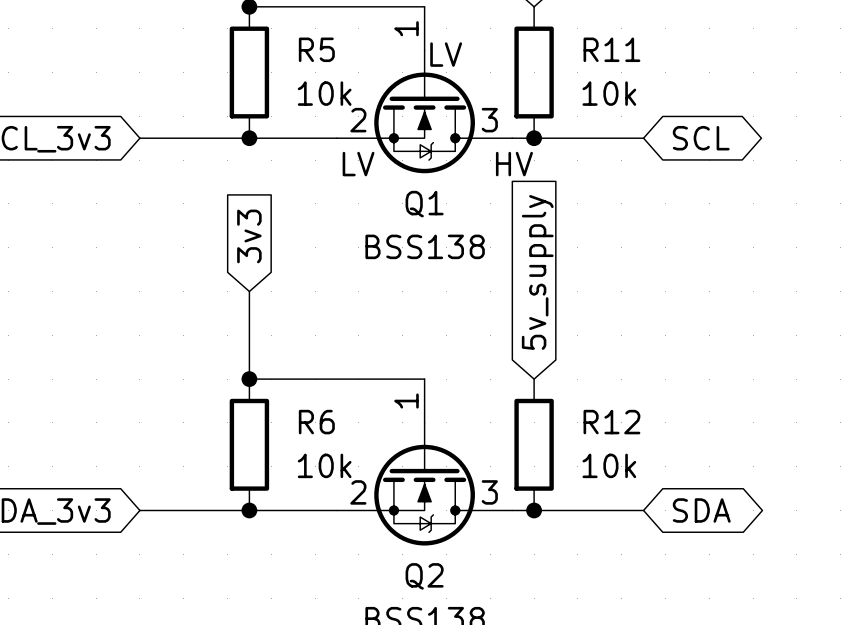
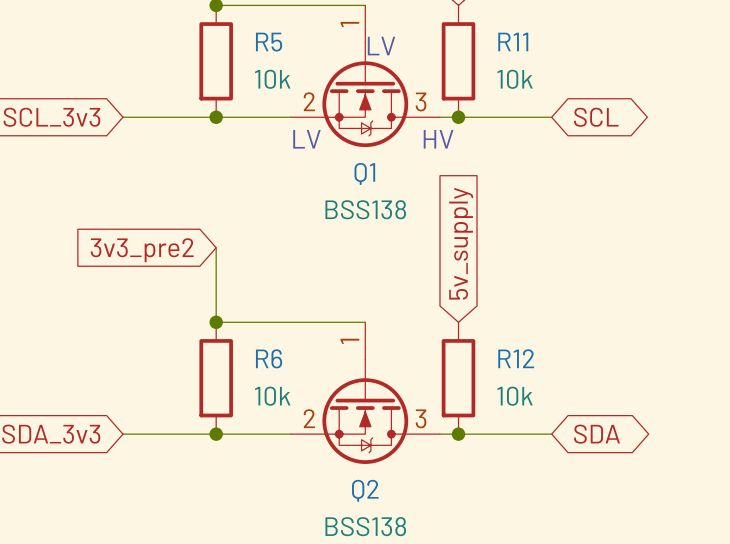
global label: 3v3 (249, 236) -> 3v3_pre2 (142, 250)

